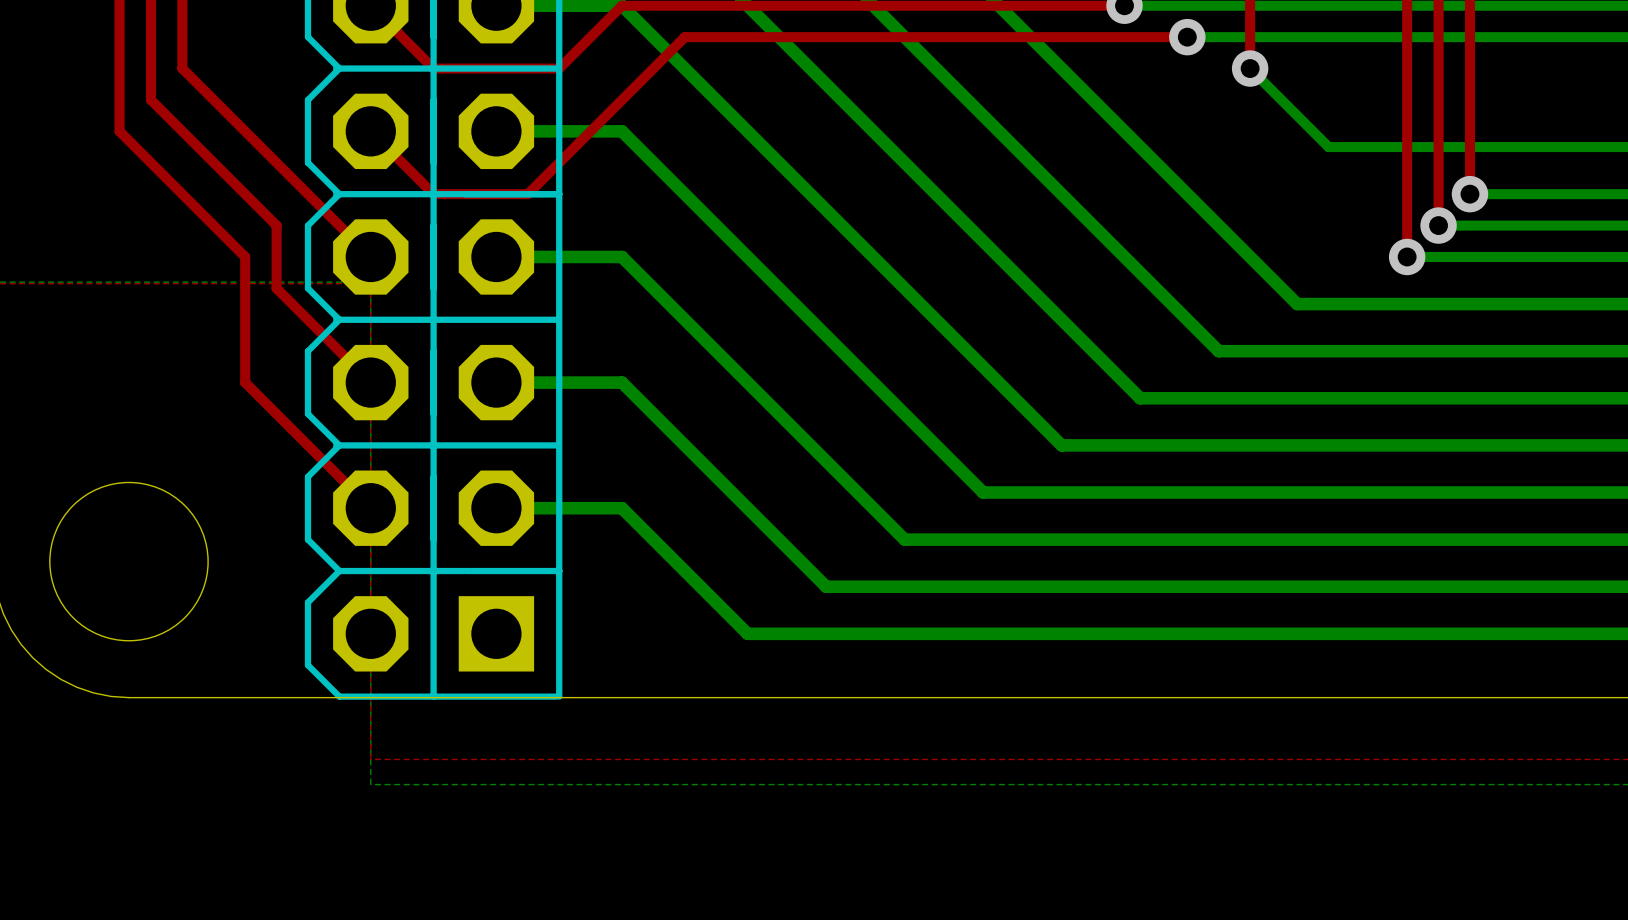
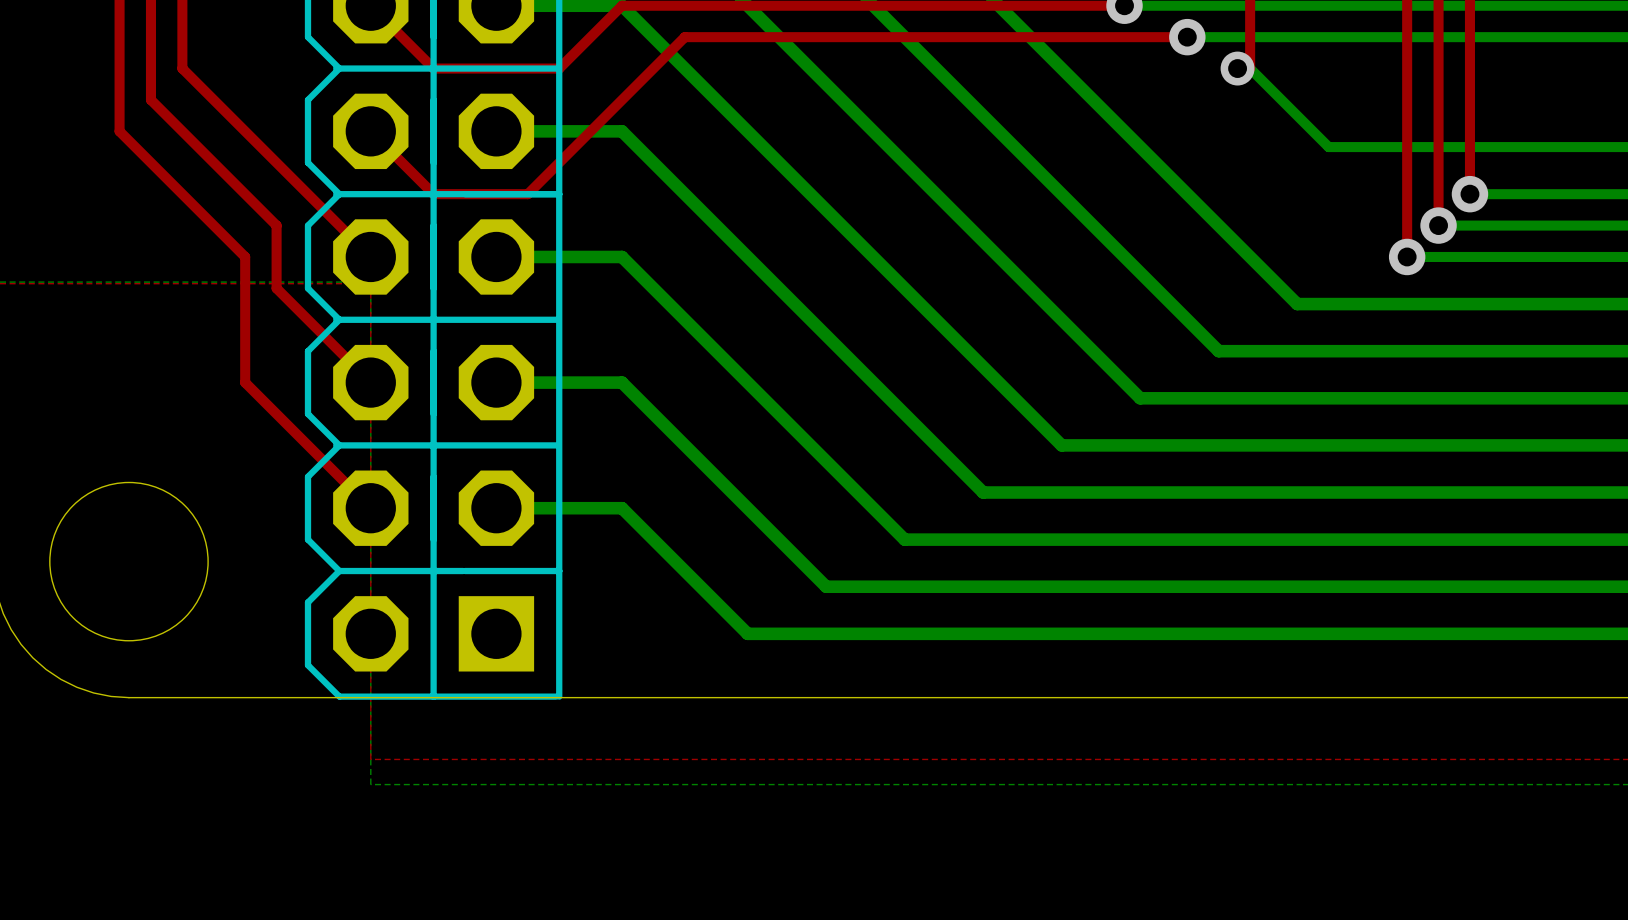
via position: (1250, 68) -> (1237, 68)

